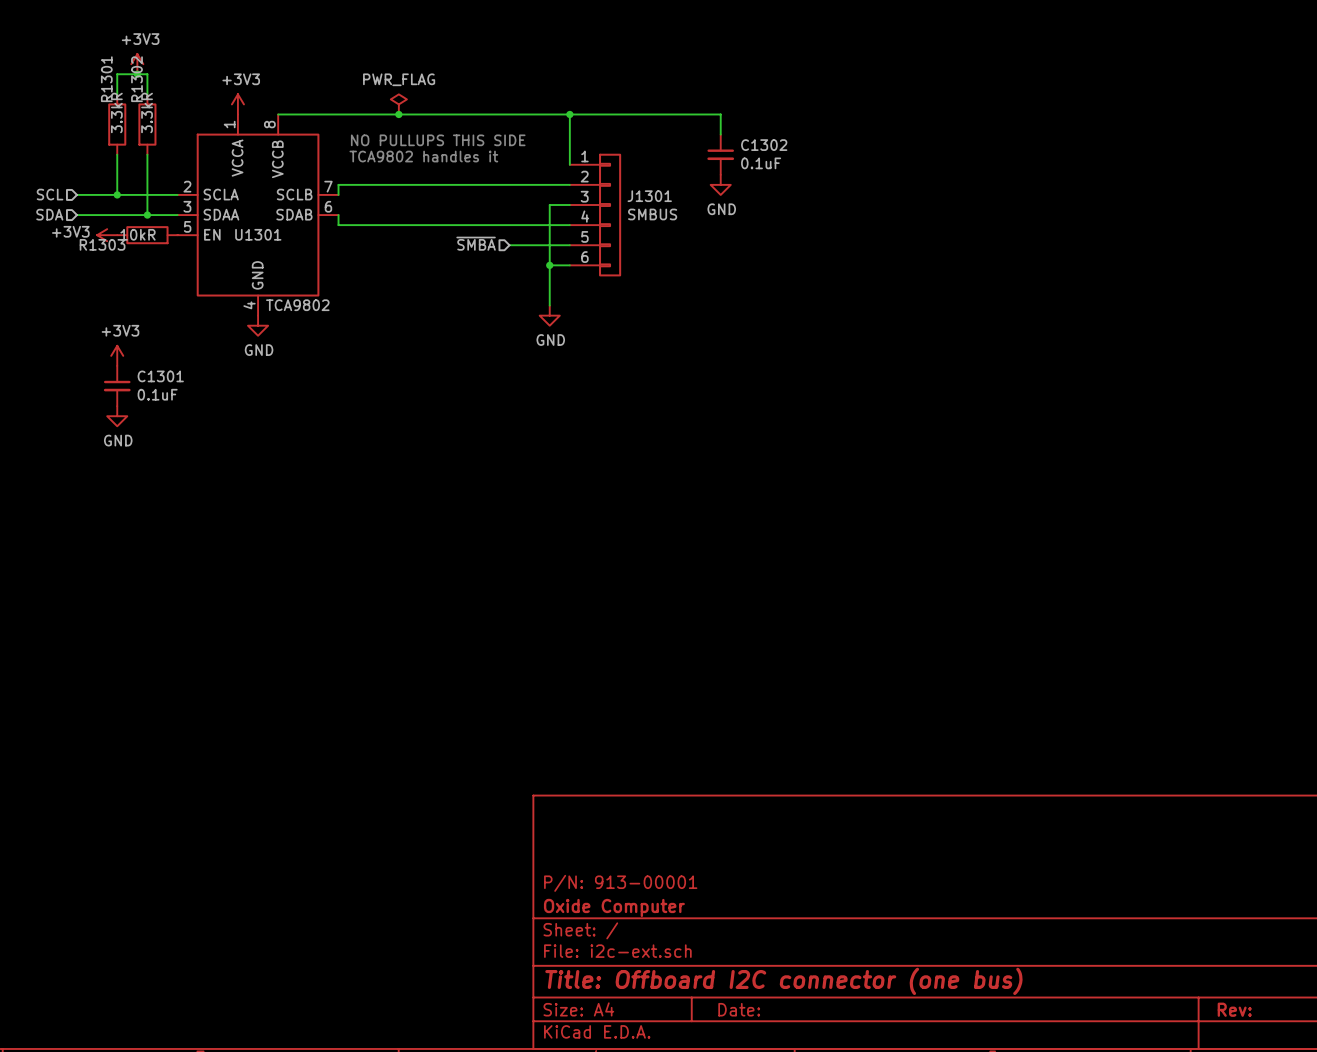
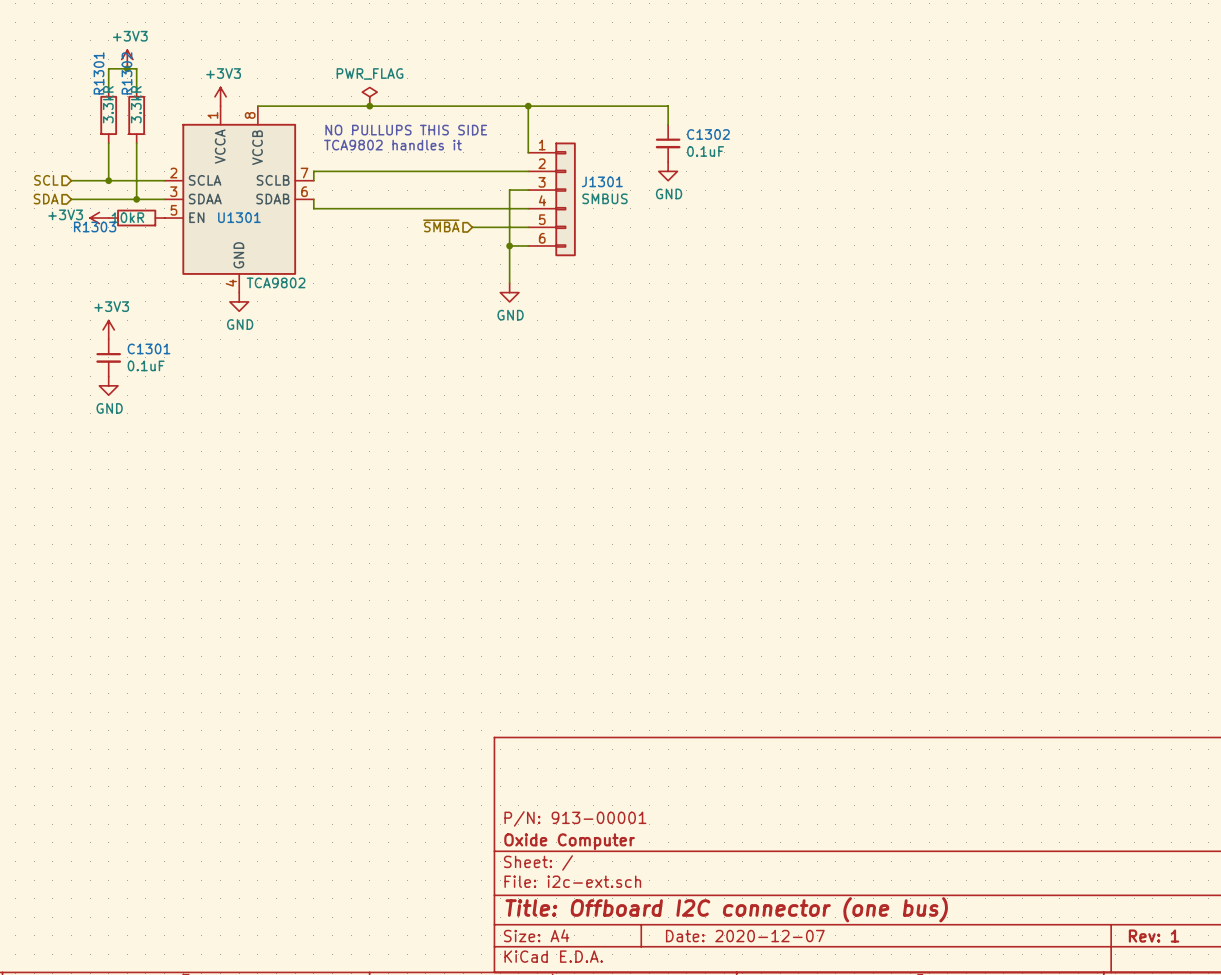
title block: Date: (739, 1009) -> Date: 2020-12-07 (745, 936)
title block: Rev: (1234, 1009) -> Rev: 1 (1154, 936)

